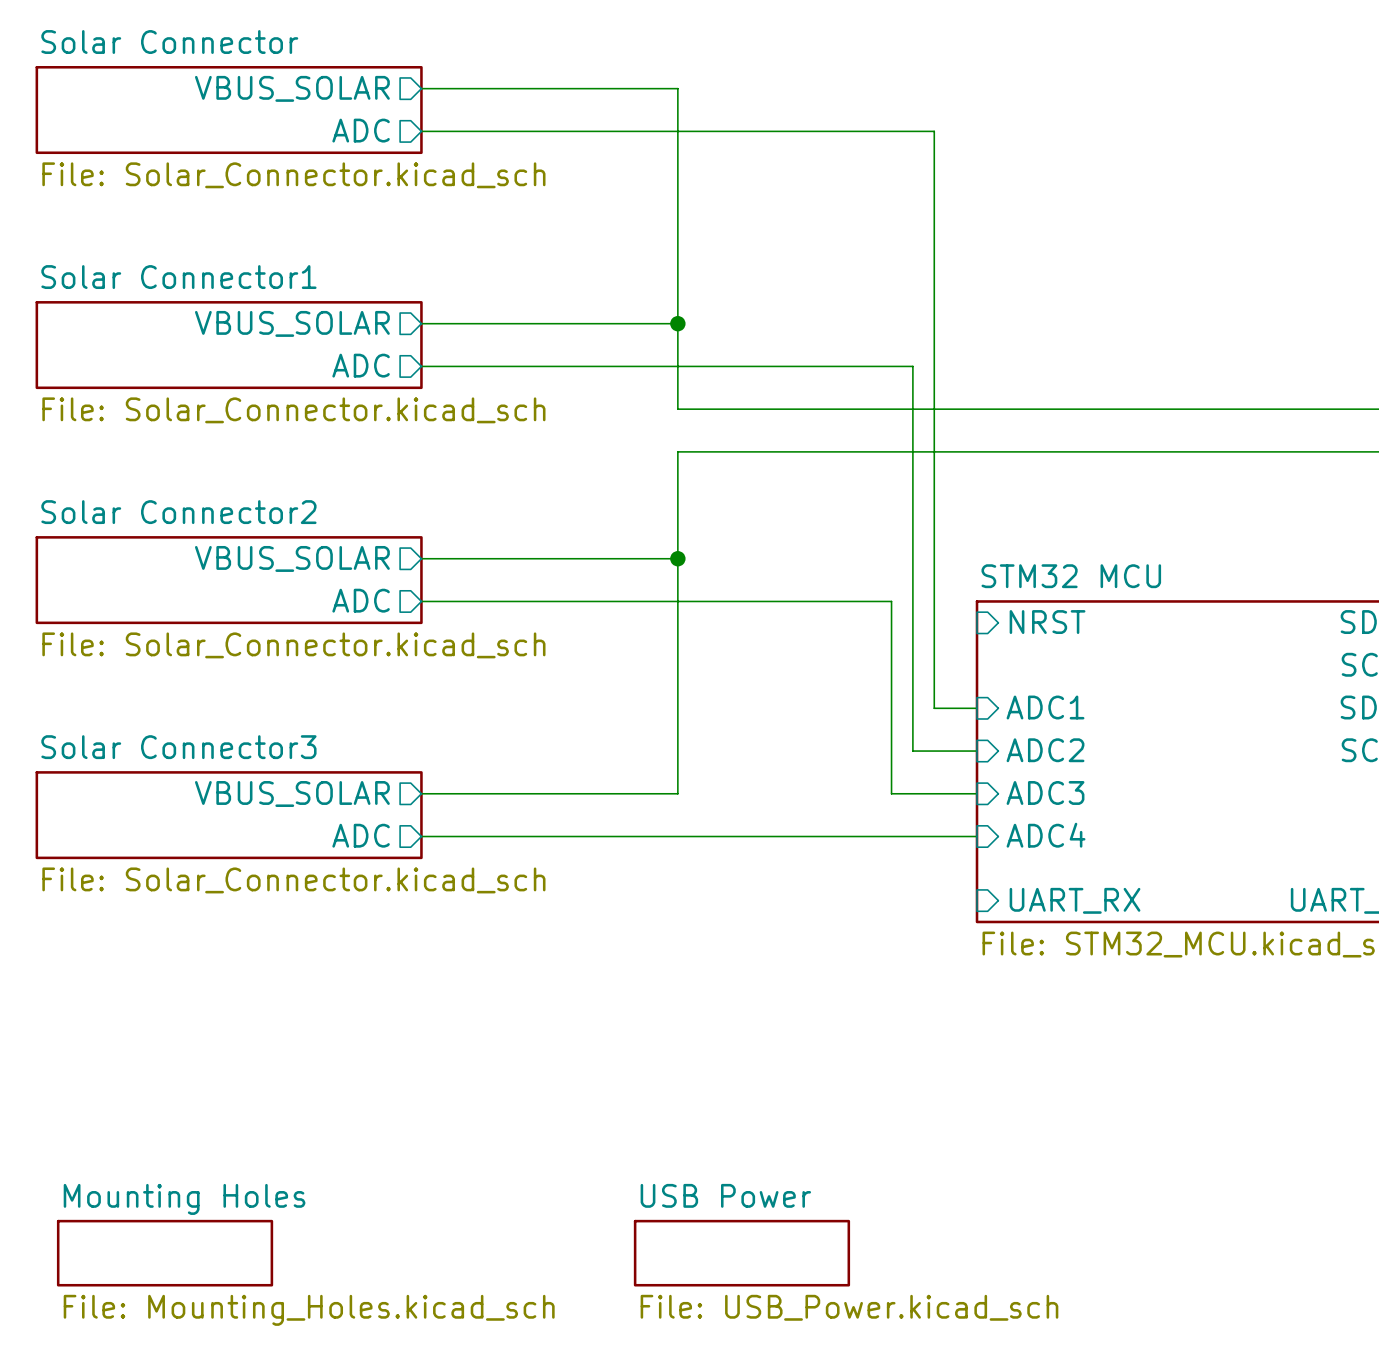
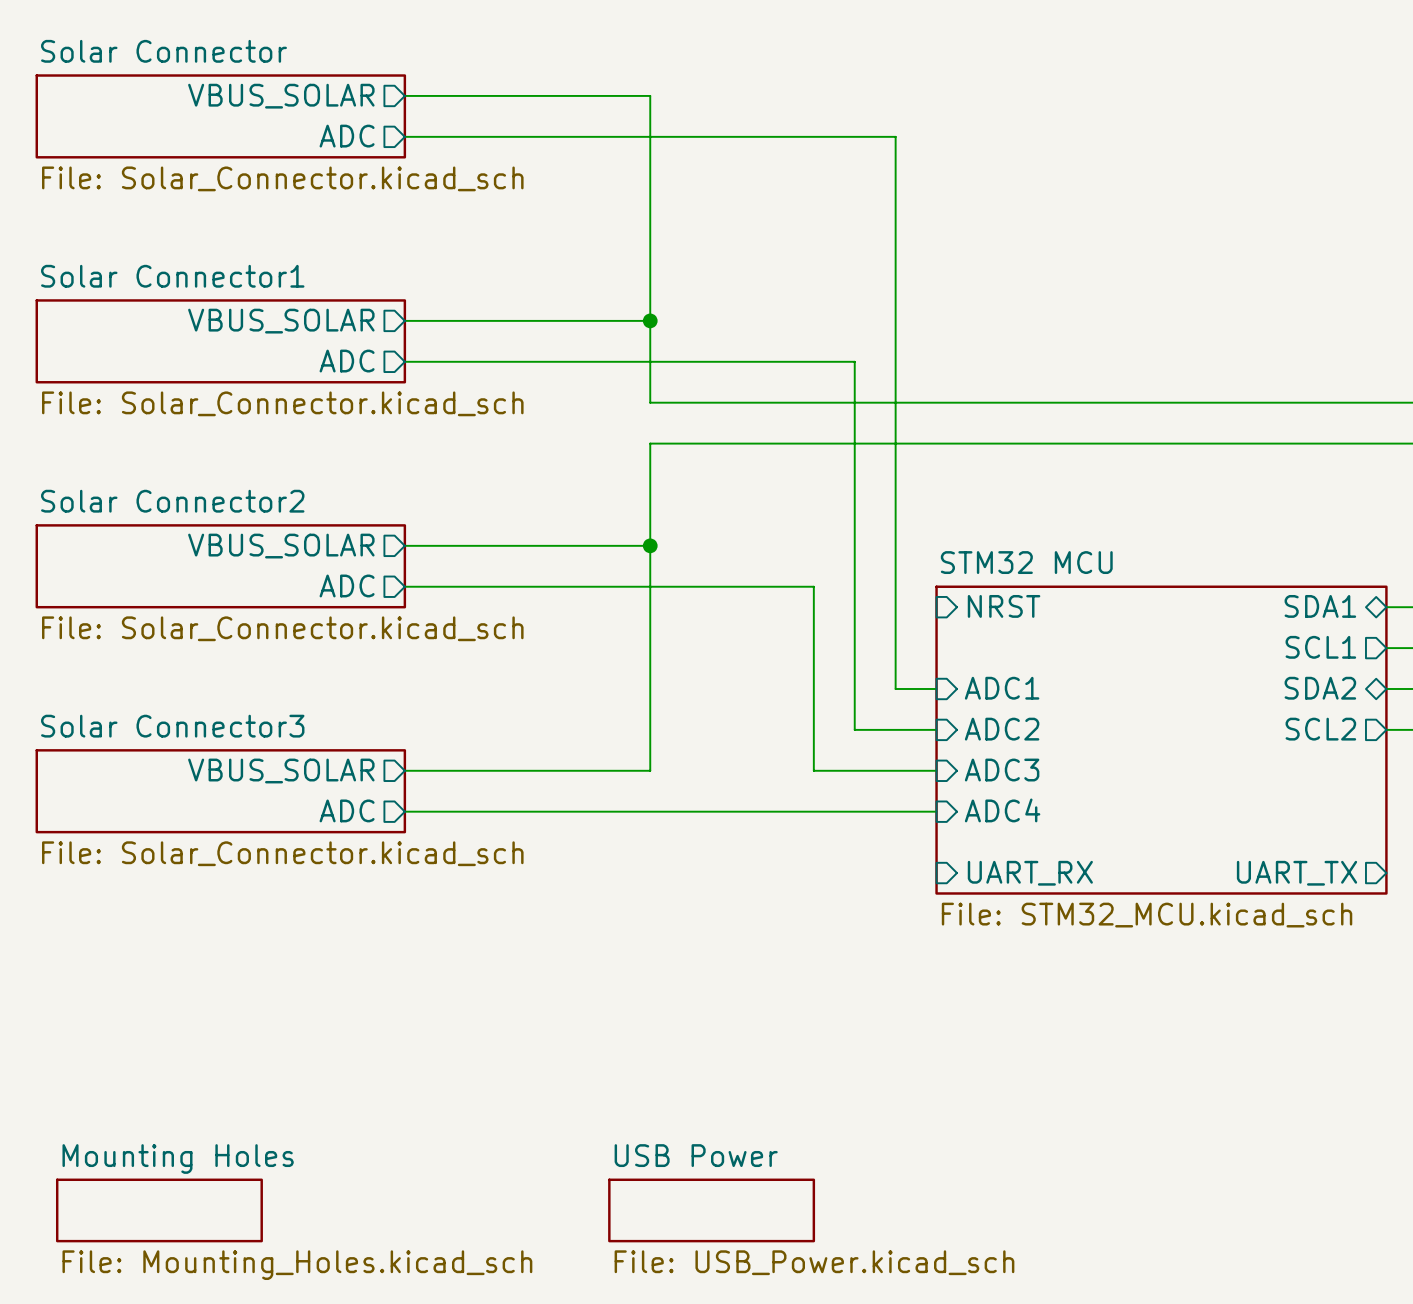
wire: (891, 366) (912, 366) (912, 751) -> (854, 361) (854, 586)
wire: (848, 601) (891, 601) -> (813, 586) (813, 770) (854, 770)
wire: (891, 751) (891, 793) -> (854, 729) (875, 729)

